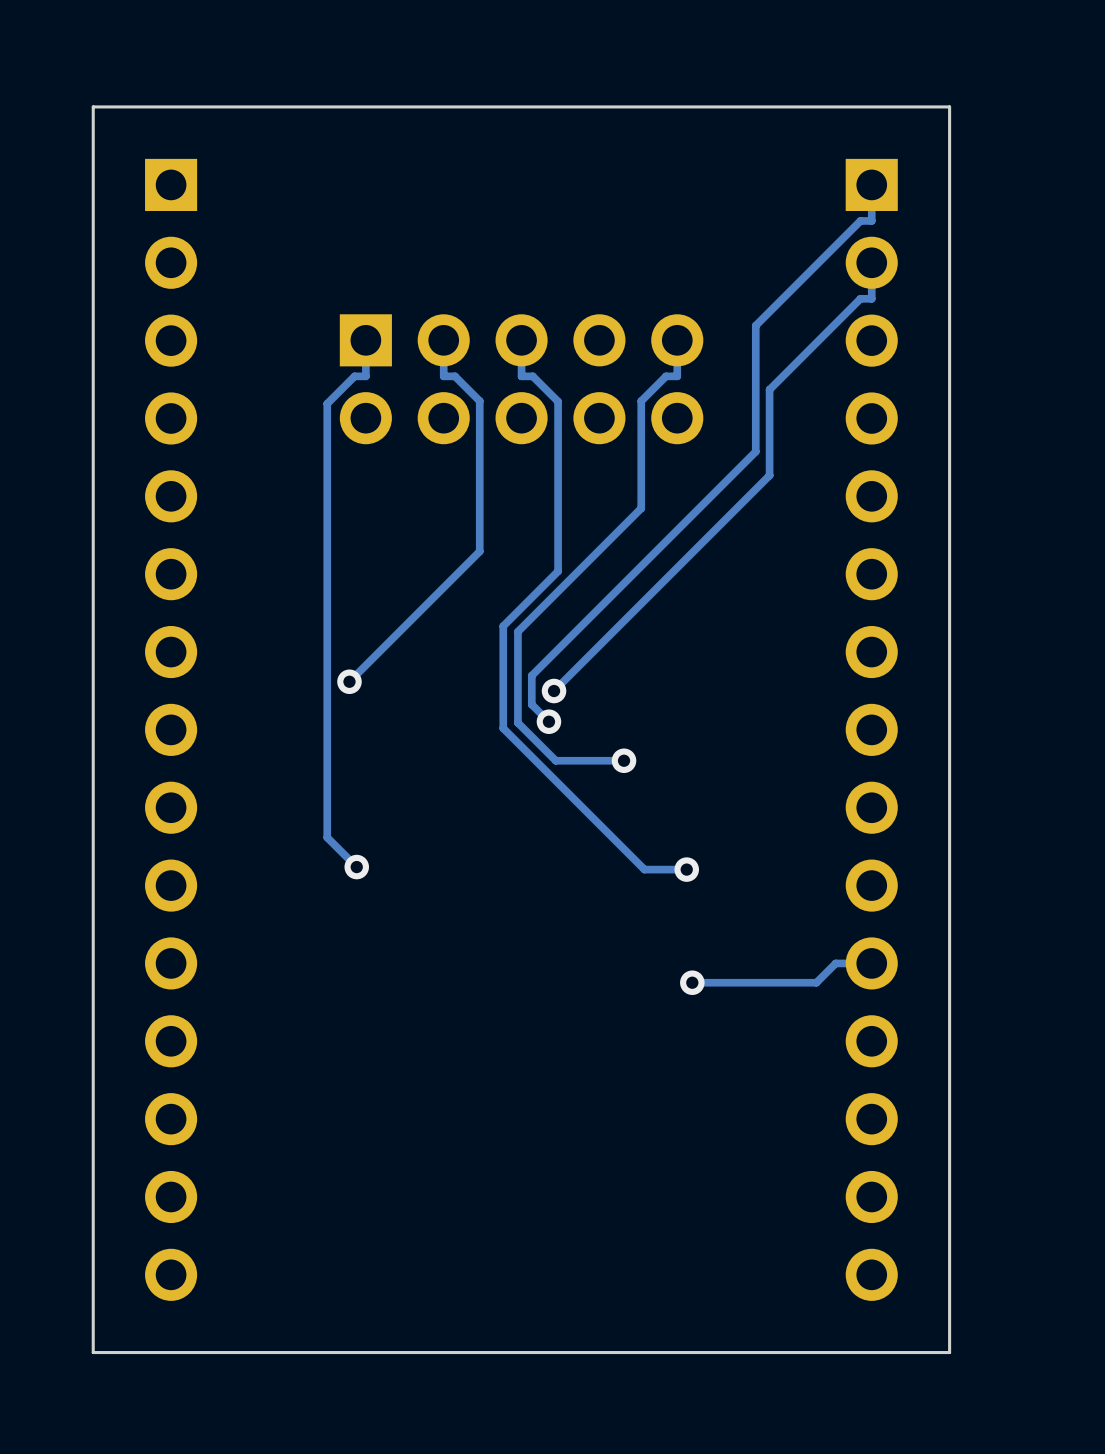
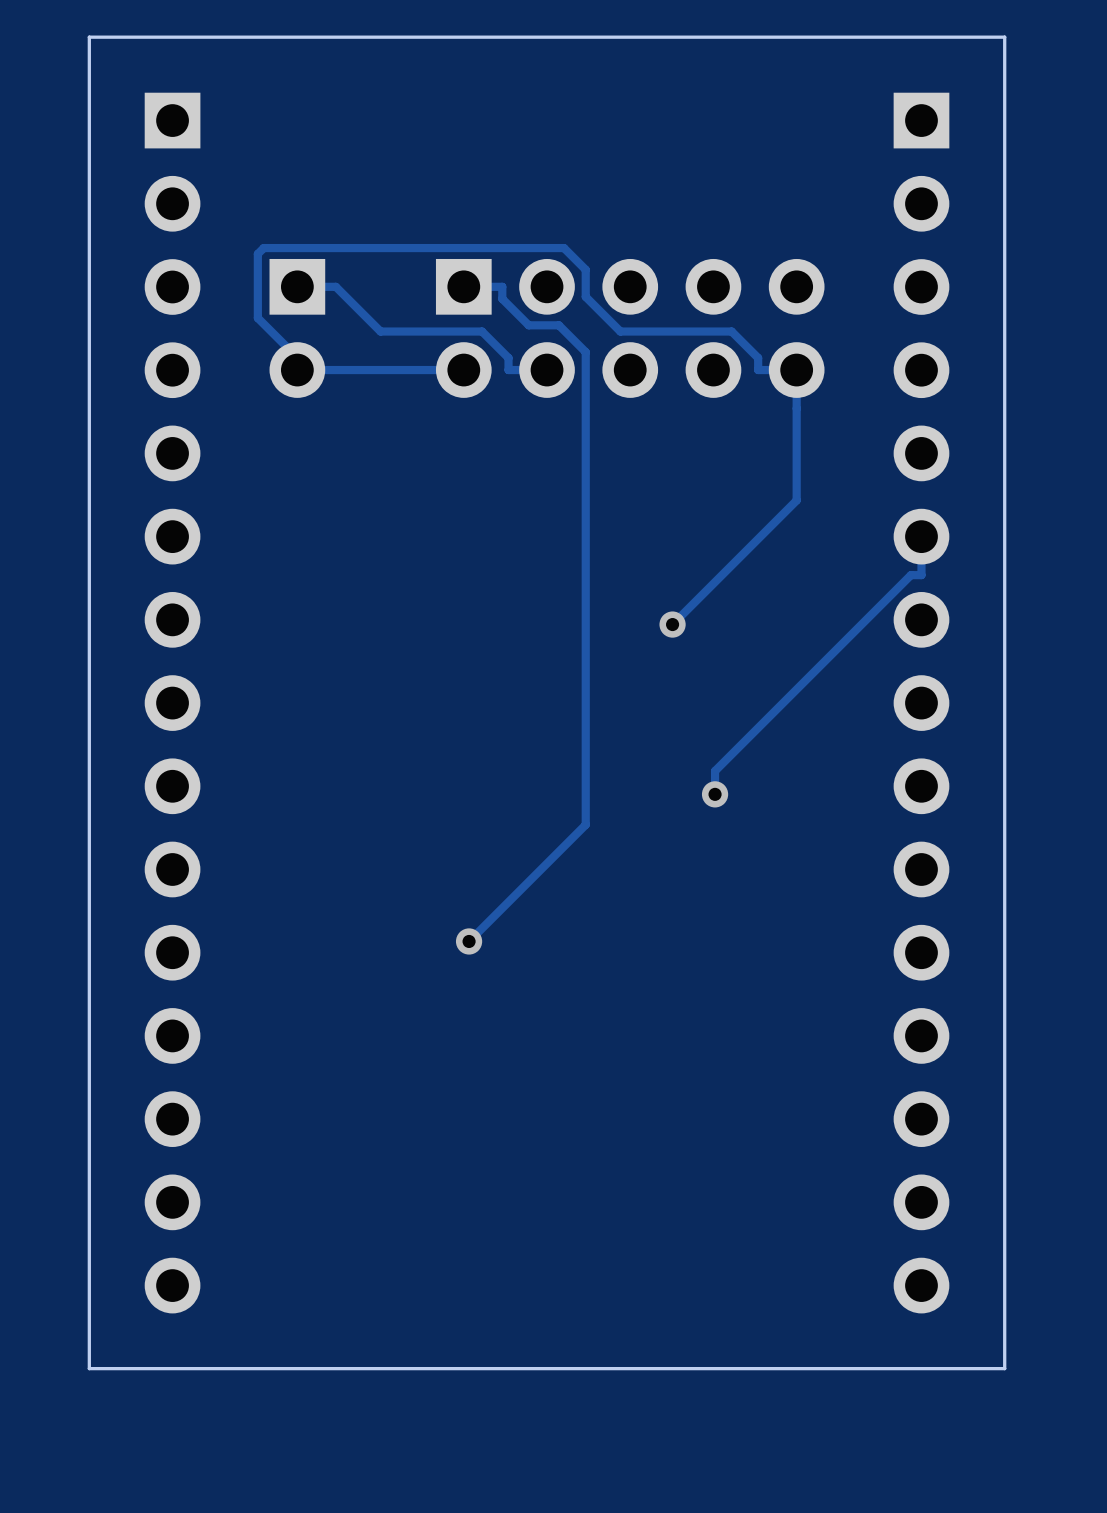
track: (871, 184) (871, 220) (860, 220) (755, 325) (755, 451) (531, 675) (531, 704) (548, 721) -> none
track: (871, 262) (871, 298) (860, 298) (769, 389) (769, 475) (554, 691) -> none
track: none -> (297, 286) (335, 286) (380, 331) (482, 331) (508, 358) (508, 370) (547, 370)
track: (365, 340) (365, 376) (354, 376) (327, 403) (327, 837) (356, 867) -> none
track: (443, 340) (443, 376) (454, 376) (479, 401) (479, 551) (349, 681) -> (463, 286) (502, 286) (502, 298) (528, 325) (558, 325) (585, 352) (585, 824) (469, 941)
track: (521, 340) (521, 376) (532, 376) (558, 401) (558, 571) (503, 626) (503, 728) (644, 869) (686, 869) -> none
track: (677, 340) (677, 376) (666, 376) (641, 401) (641, 508) (517, 631) (517, 722) (555, 760) (624, 760) -> none
part: none -> (297, 328)
part position: (521, 379) -> (630, 328)
track: none -> (309, 370) (257, 318) (257, 253) (263, 248) (564, 248) (585, 269) (585, 296) (620, 331) (731, 331) (758, 358) (758, 370) (796, 370) (796, 500) (672, 624)
track: none -> (463, 370) (297, 370)
track: none -> (921, 536) (921, 575) (910, 575) (715, 771) (715, 794)
via: none -> (672, 624)
via: (349, 681) -> none
via: (554, 691) -> none
via: (548, 721) -> none
via: (624, 760) -> none
via: none -> (715, 794)
via: (356, 867) -> none
via: (686, 869) -> none
via: none -> (469, 941)
track: (871, 963) (835, 963) (816, 982) (692, 982) -> none
via: (692, 982) -> none

